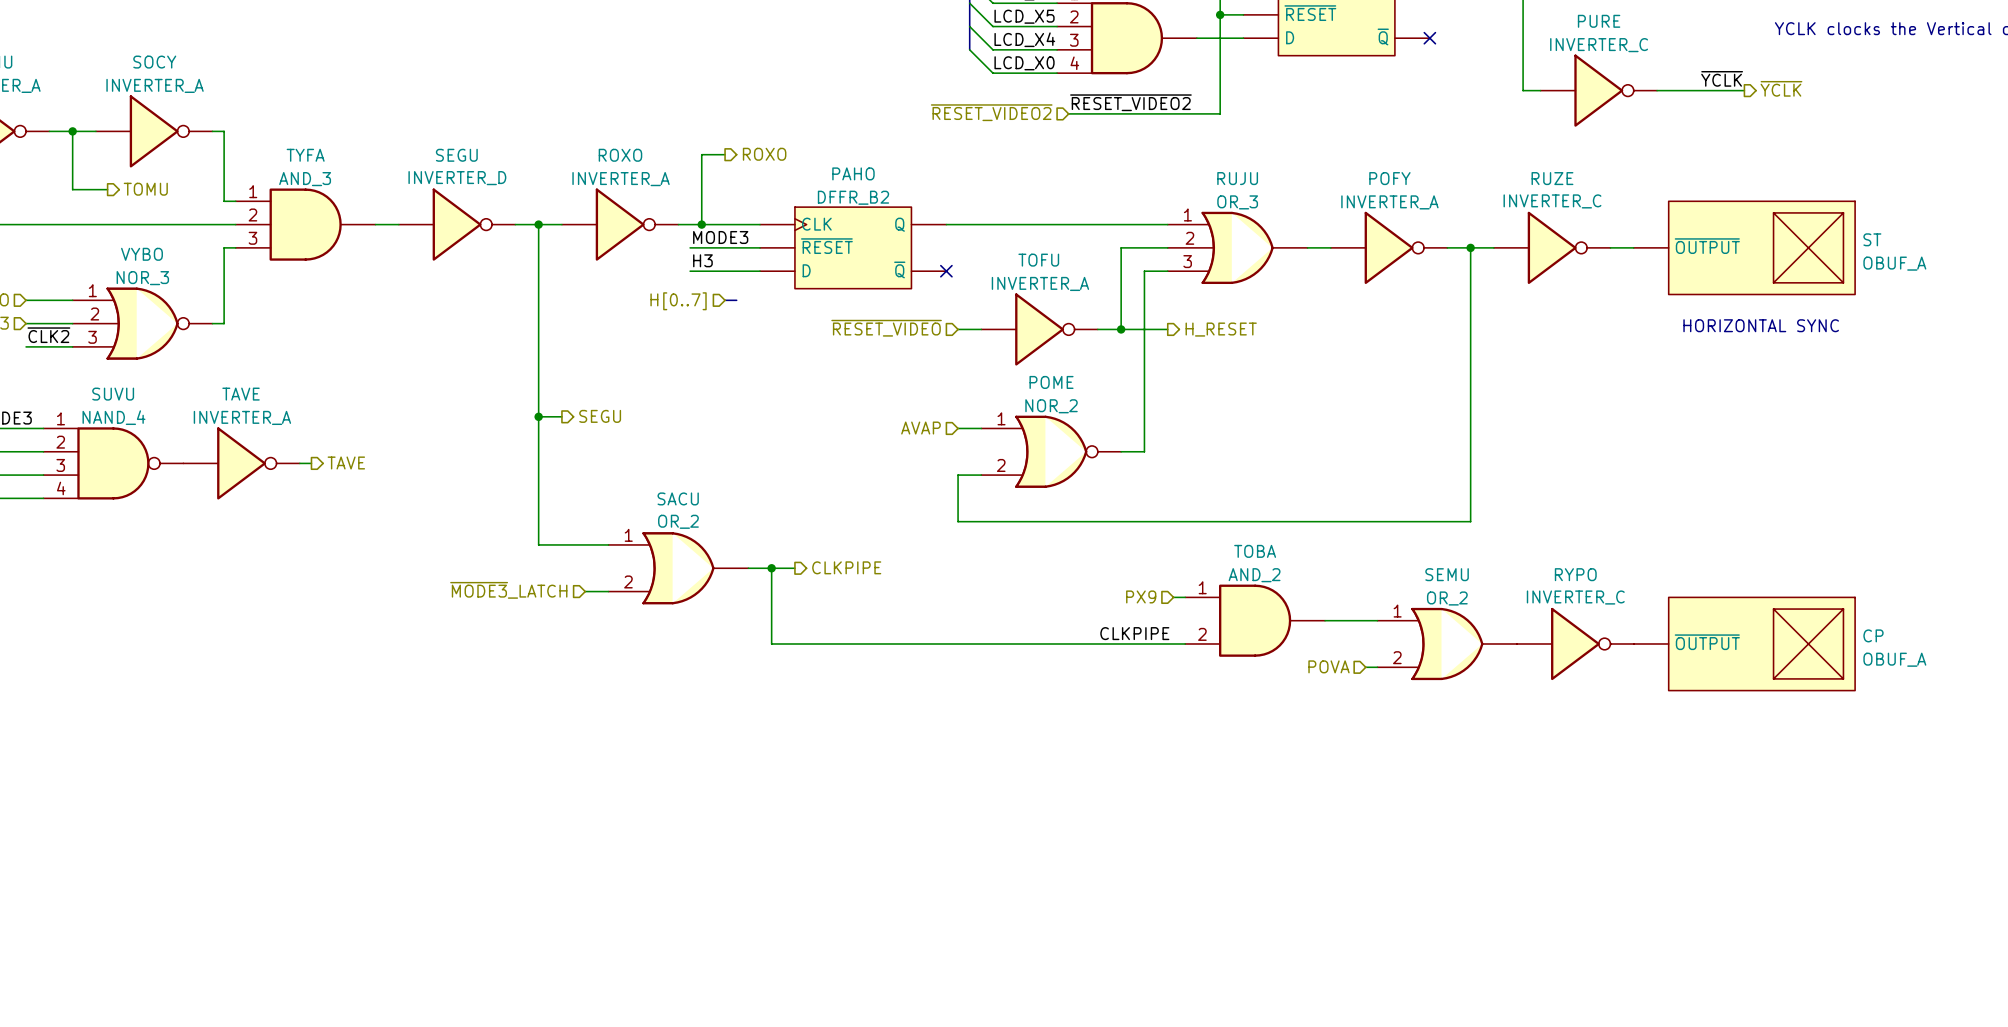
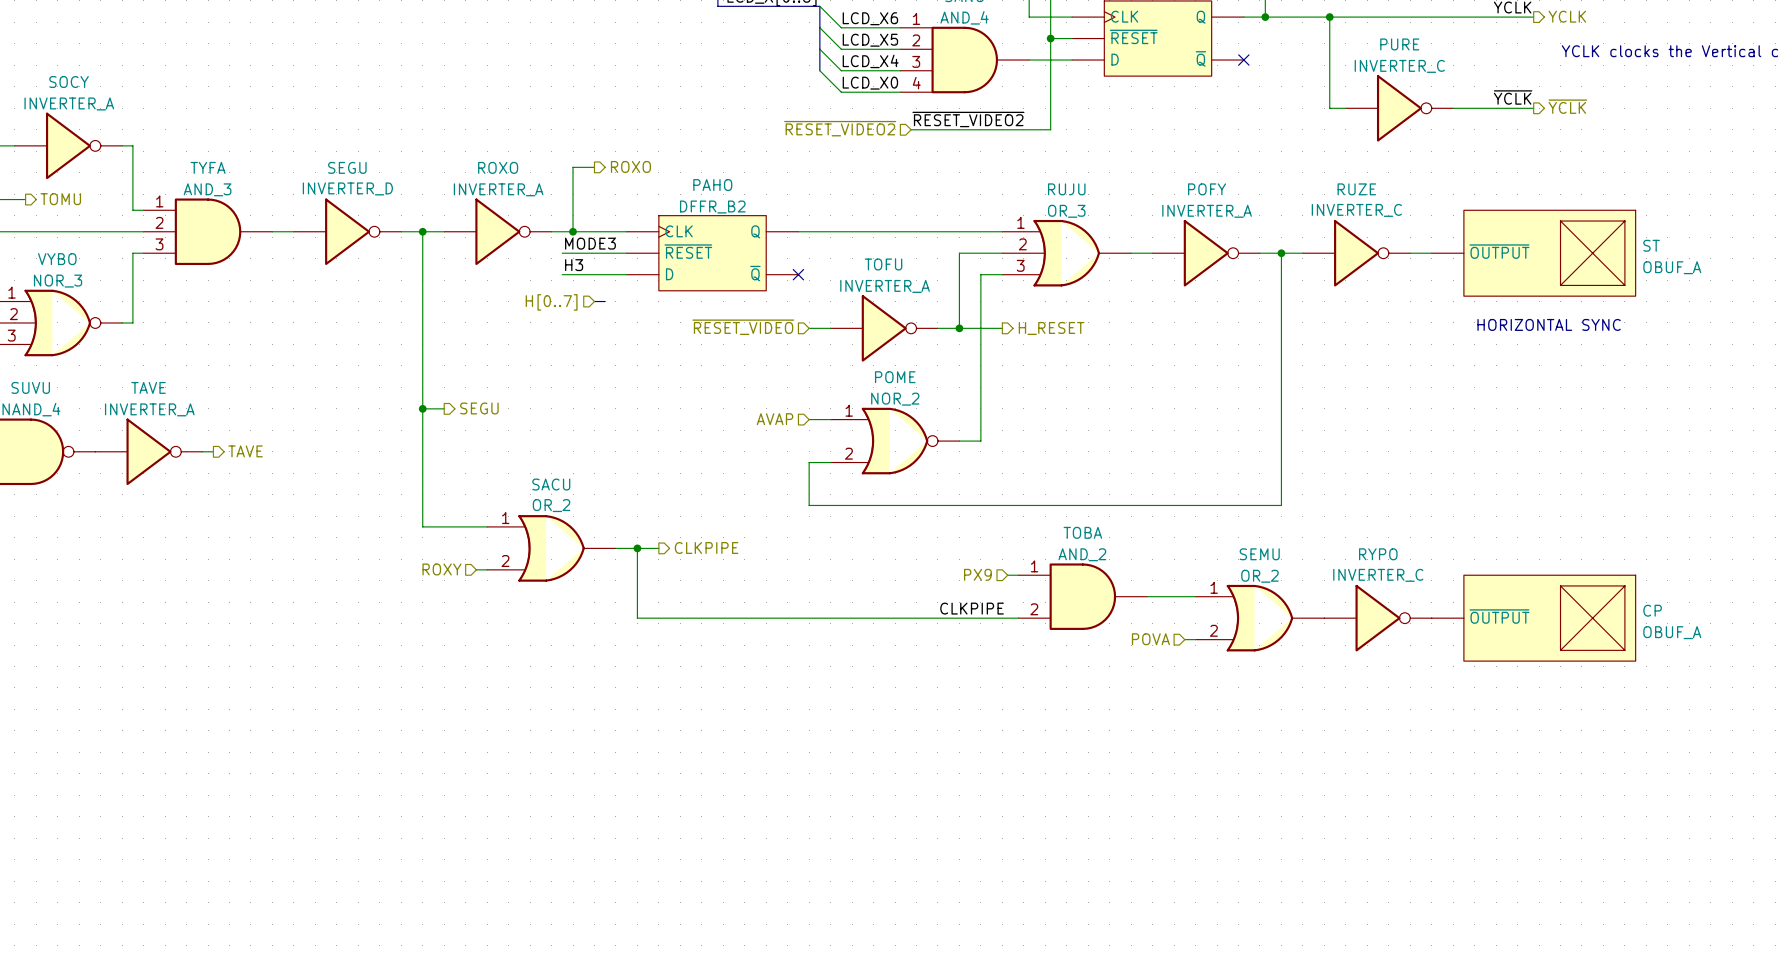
hierarchical label: ~{MODE3}_LATCH (508, 590) -> none
hierarchical label: none -> ROXY (441, 569)
wire: (585, 591) (596, 591) -> none

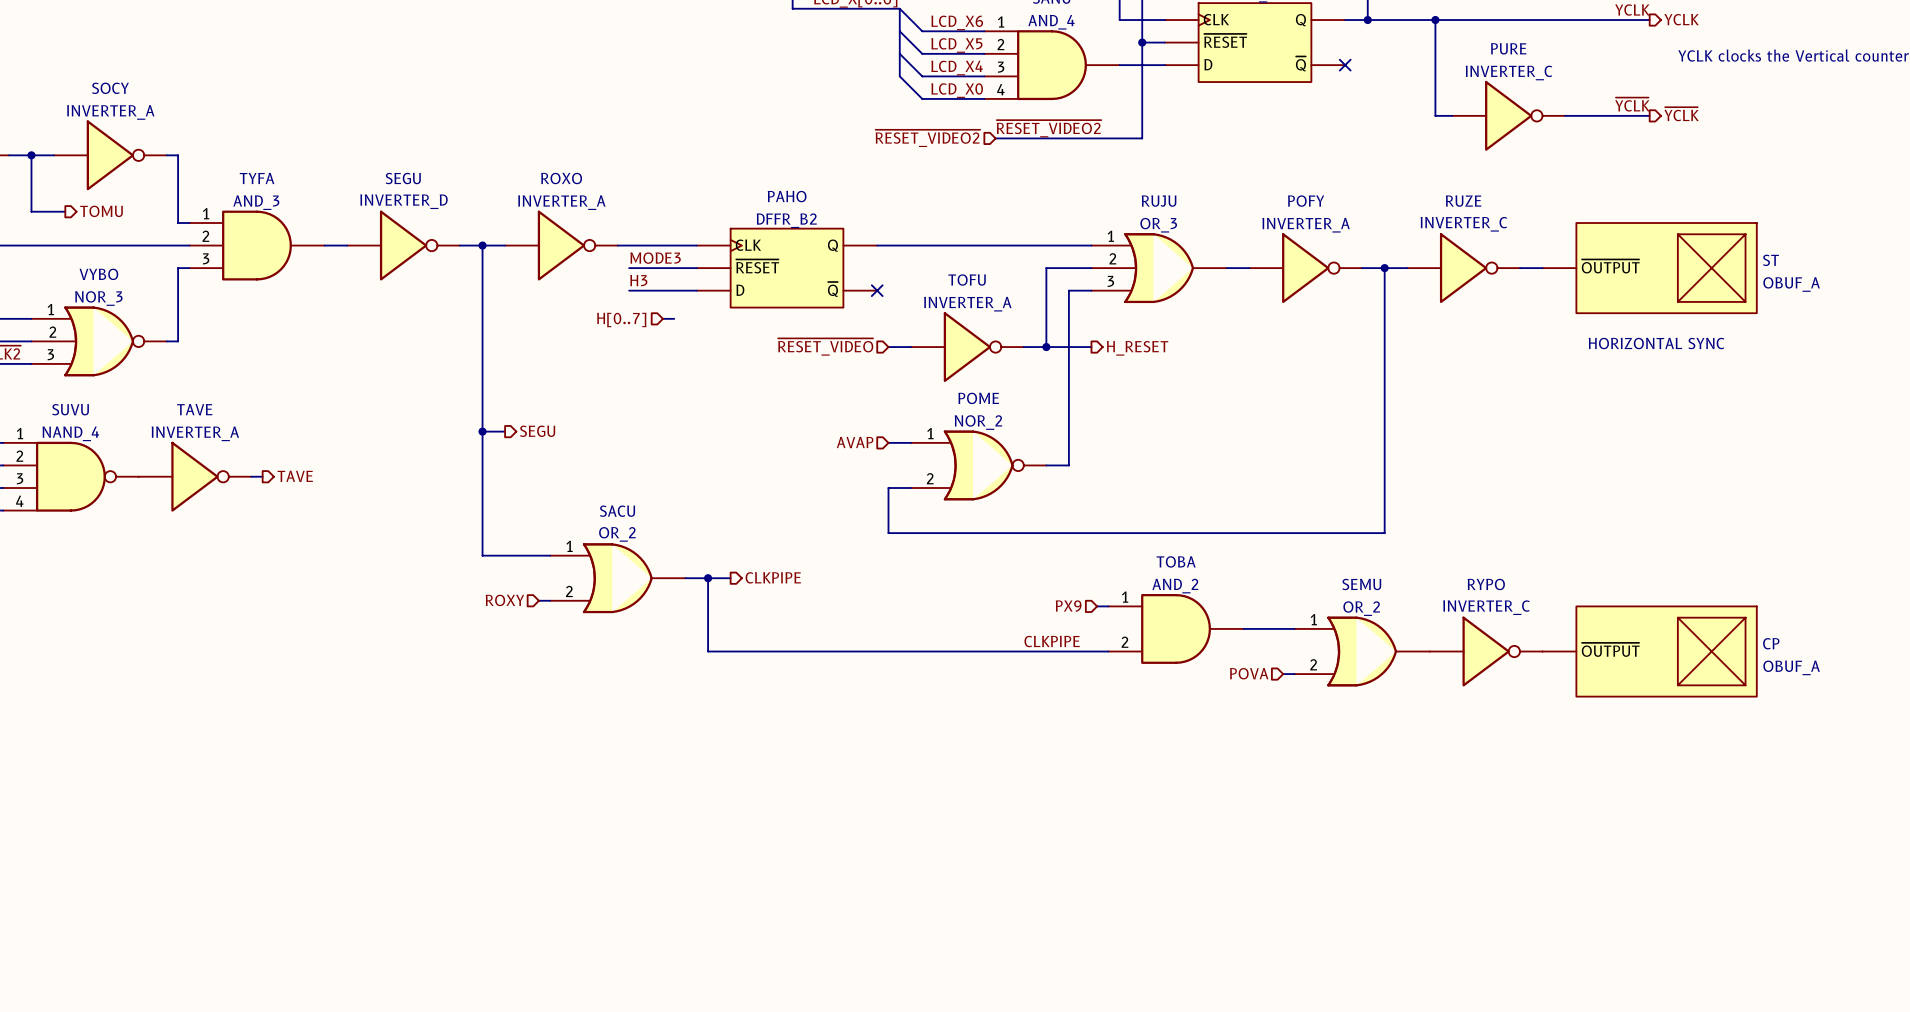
hierarchical label: ROXO (630, 166) -> none
wire: (594, 167) (573, 167) (573, 231) -> none
junction: (573, 231) -> none

